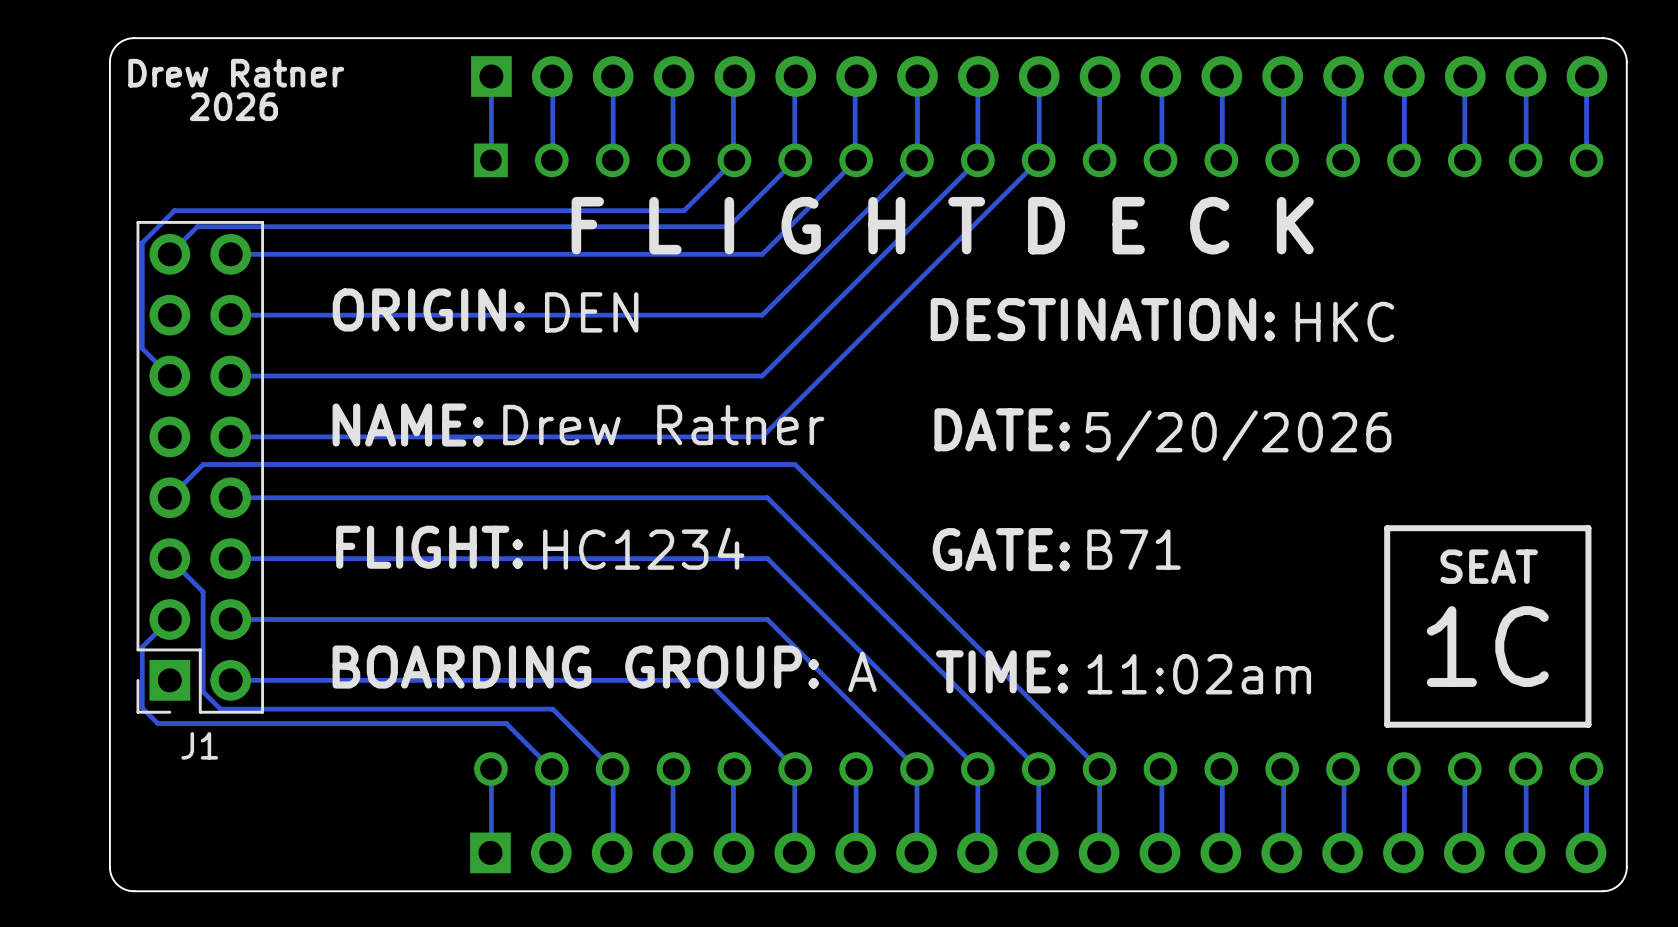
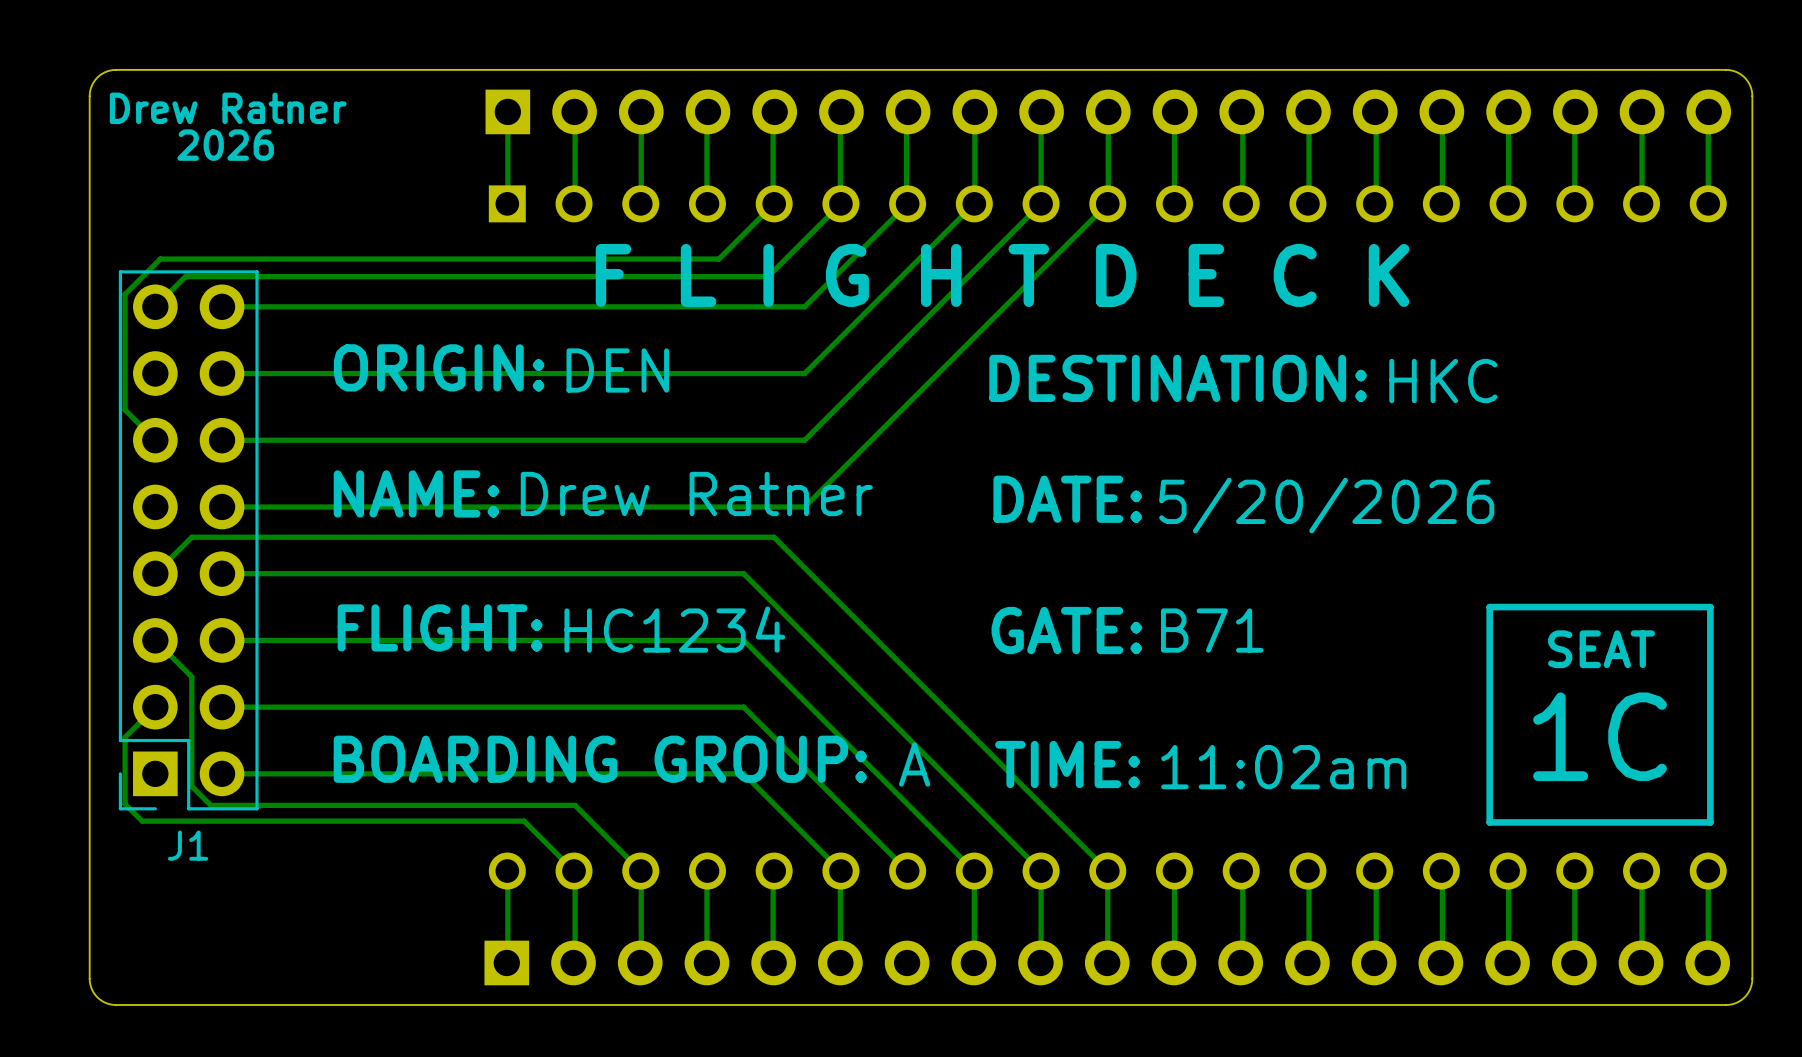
track: (734, 464) (795, 464) (1099, 769) -> none
track: (767, 497) (706, 497) -> (810, 573) (773, 537)
track: (767, 558) (706, 558) -> (810, 640) (743, 573)
track: (767, 619) (706, 619) -> (810, 707) (743, 640)
track: (856, 769) (855, 852) -> (907, 871) (743, 707)

